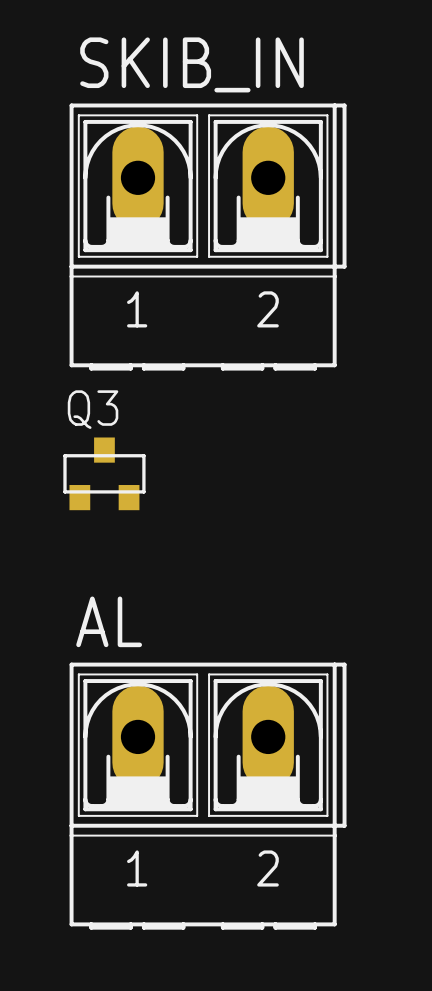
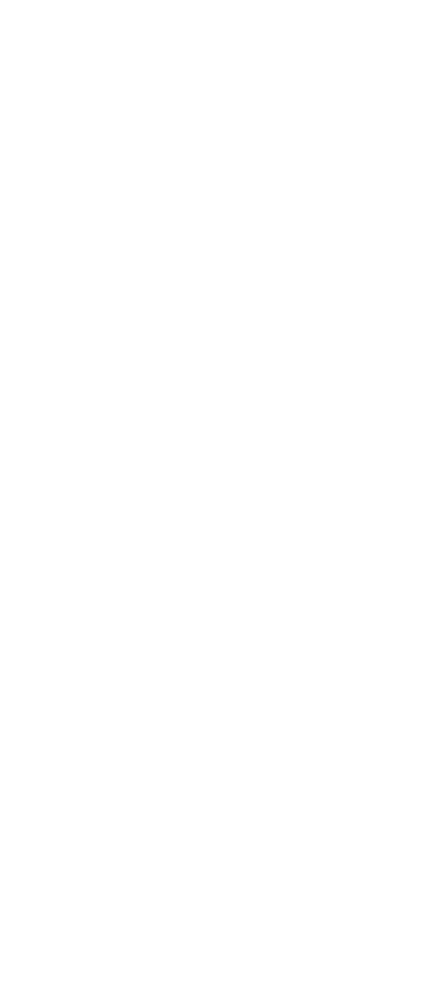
SKIB_IN: (208, 237) -> none
Q3: (104, 473) -> none
AL: (208, 796) -> none

